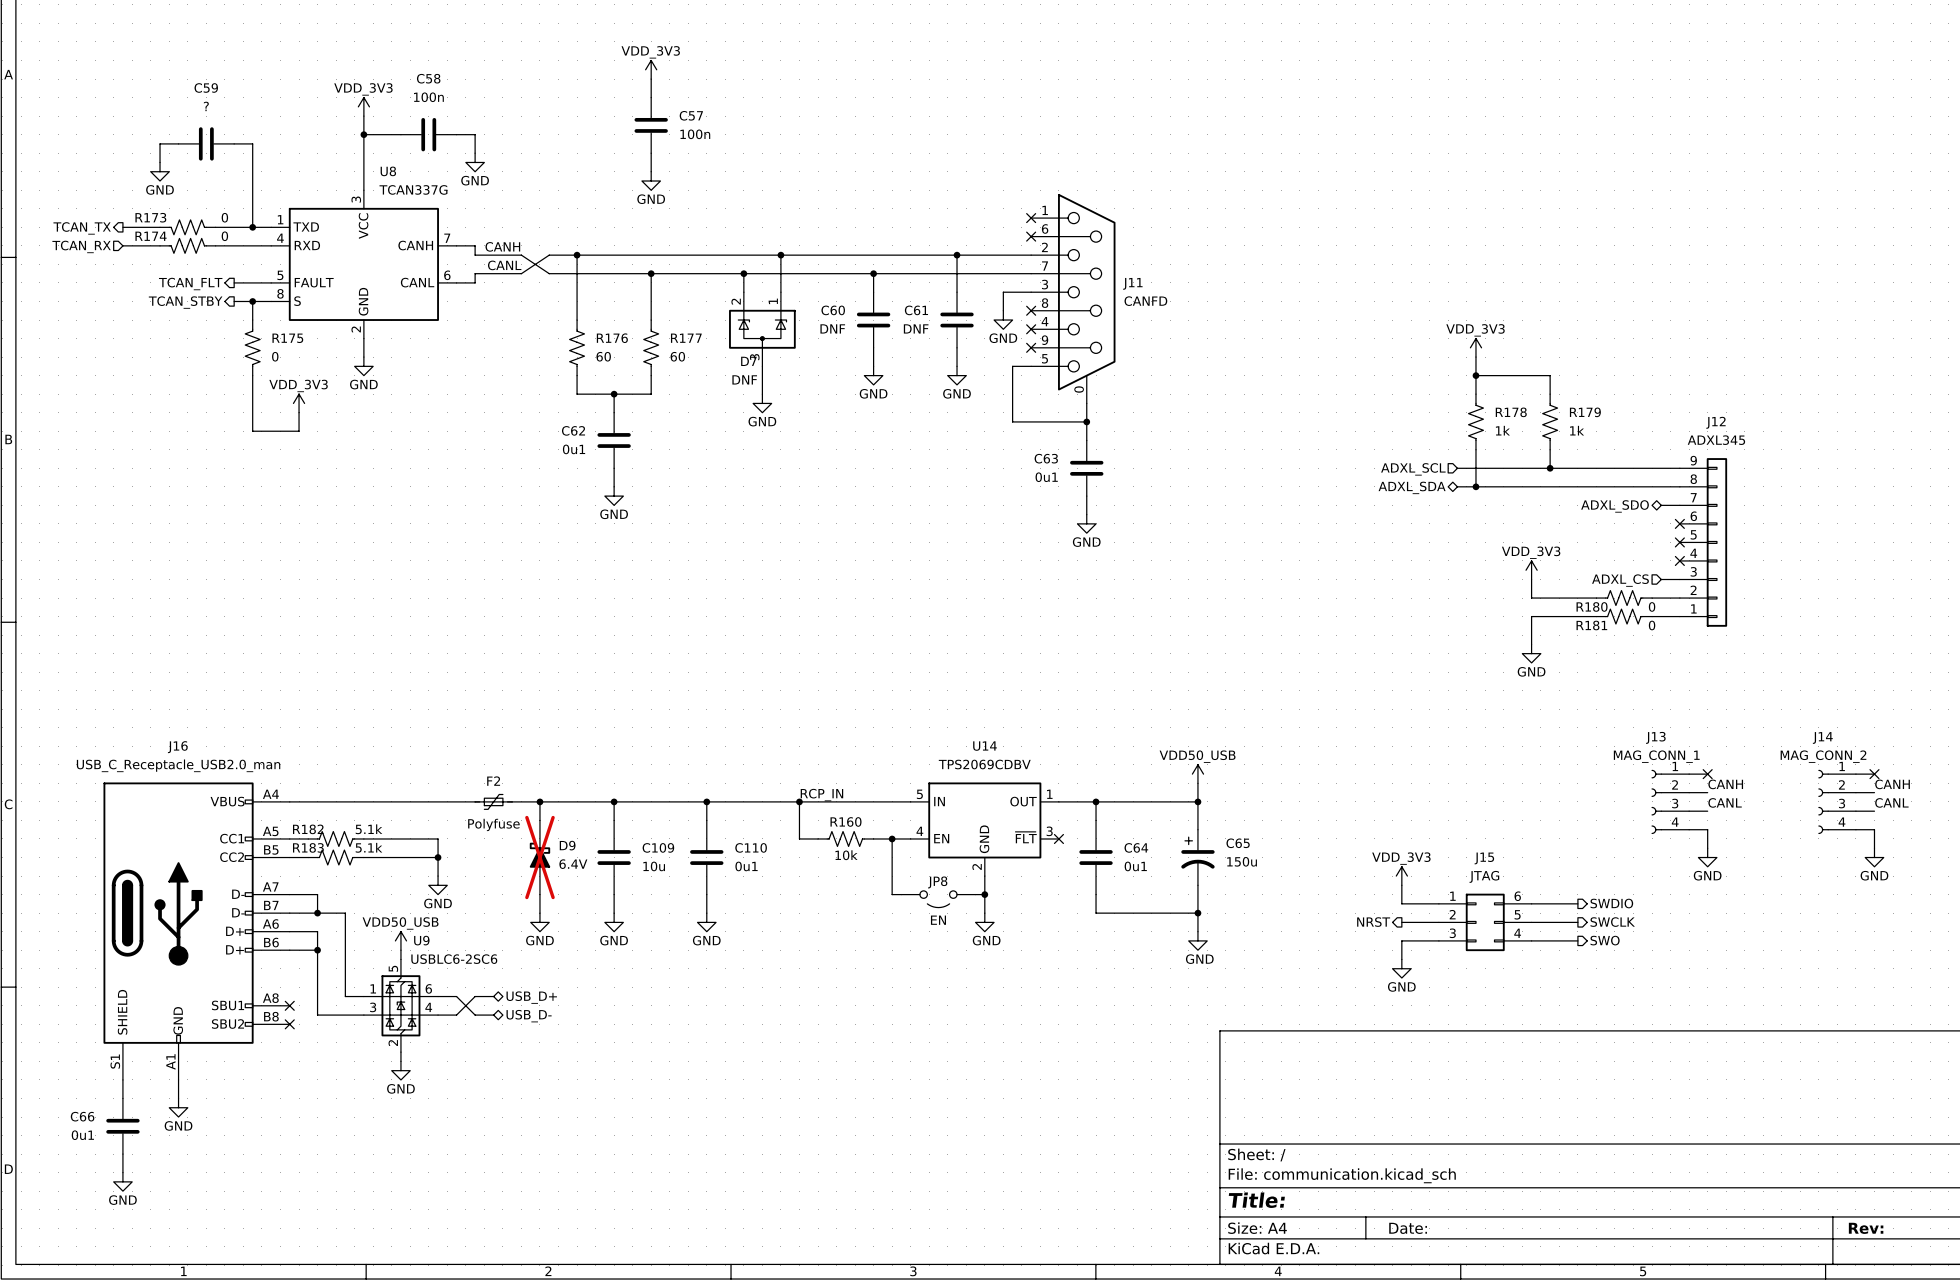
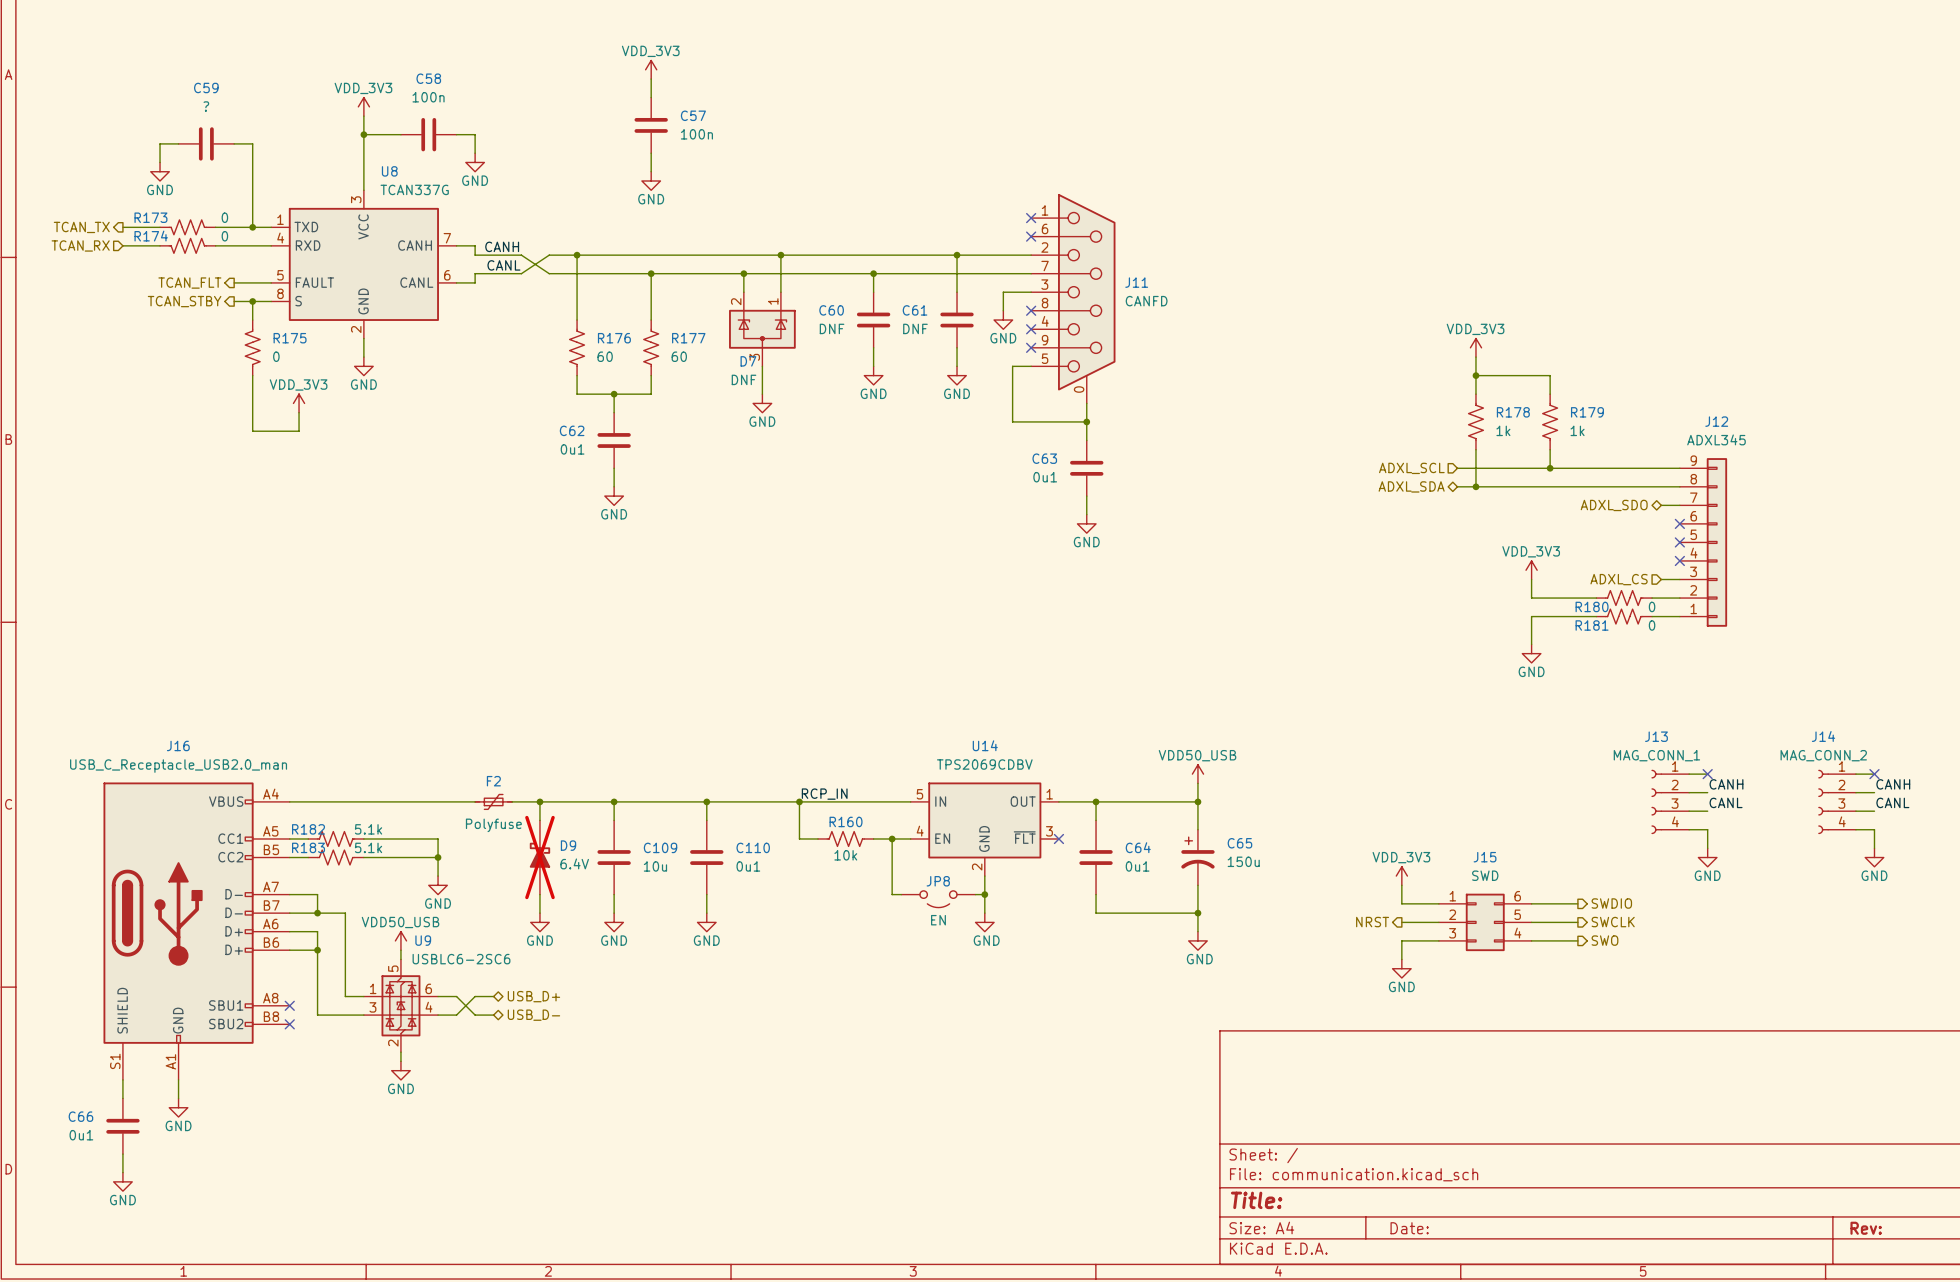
J15 value: JTAG (1484, 876) -> SWD (1485, 875)

